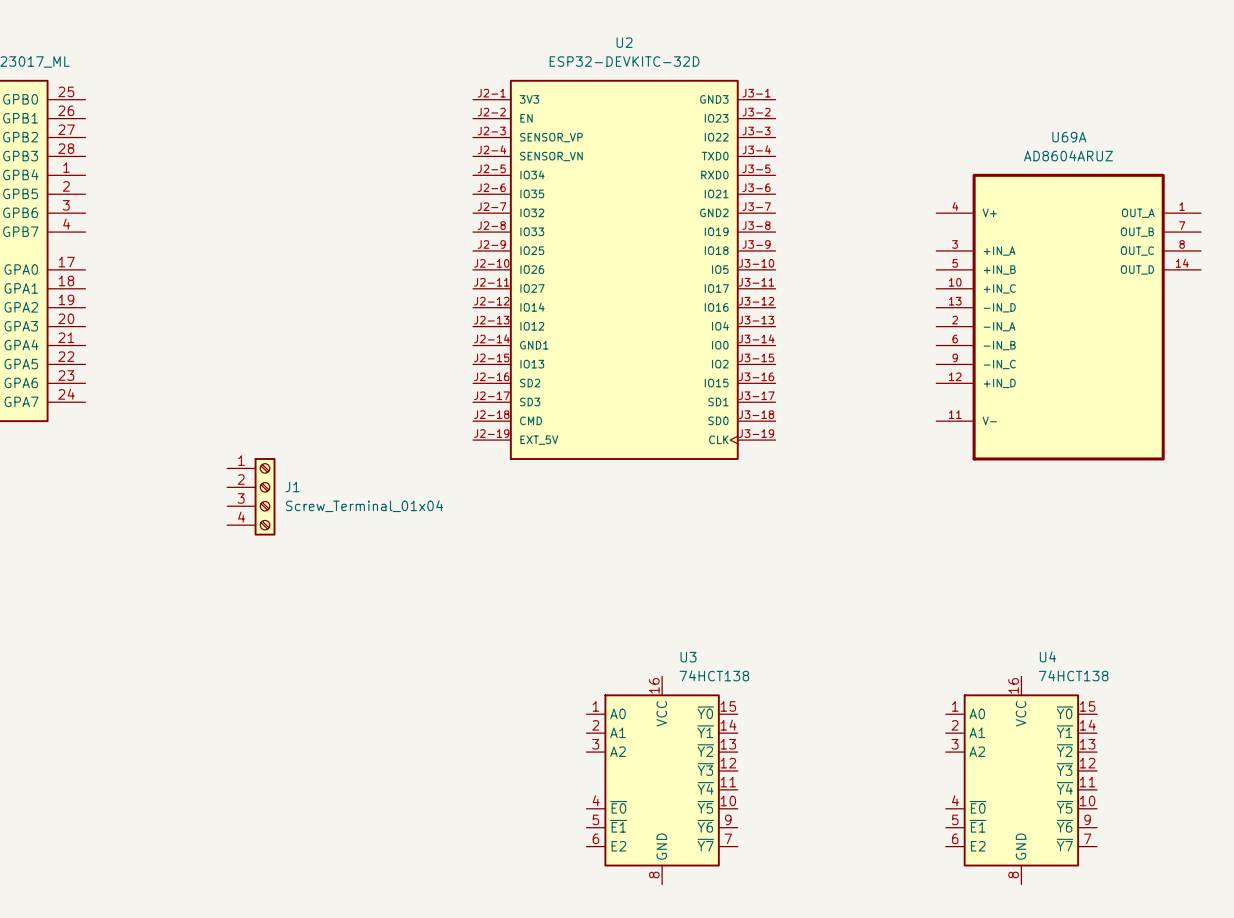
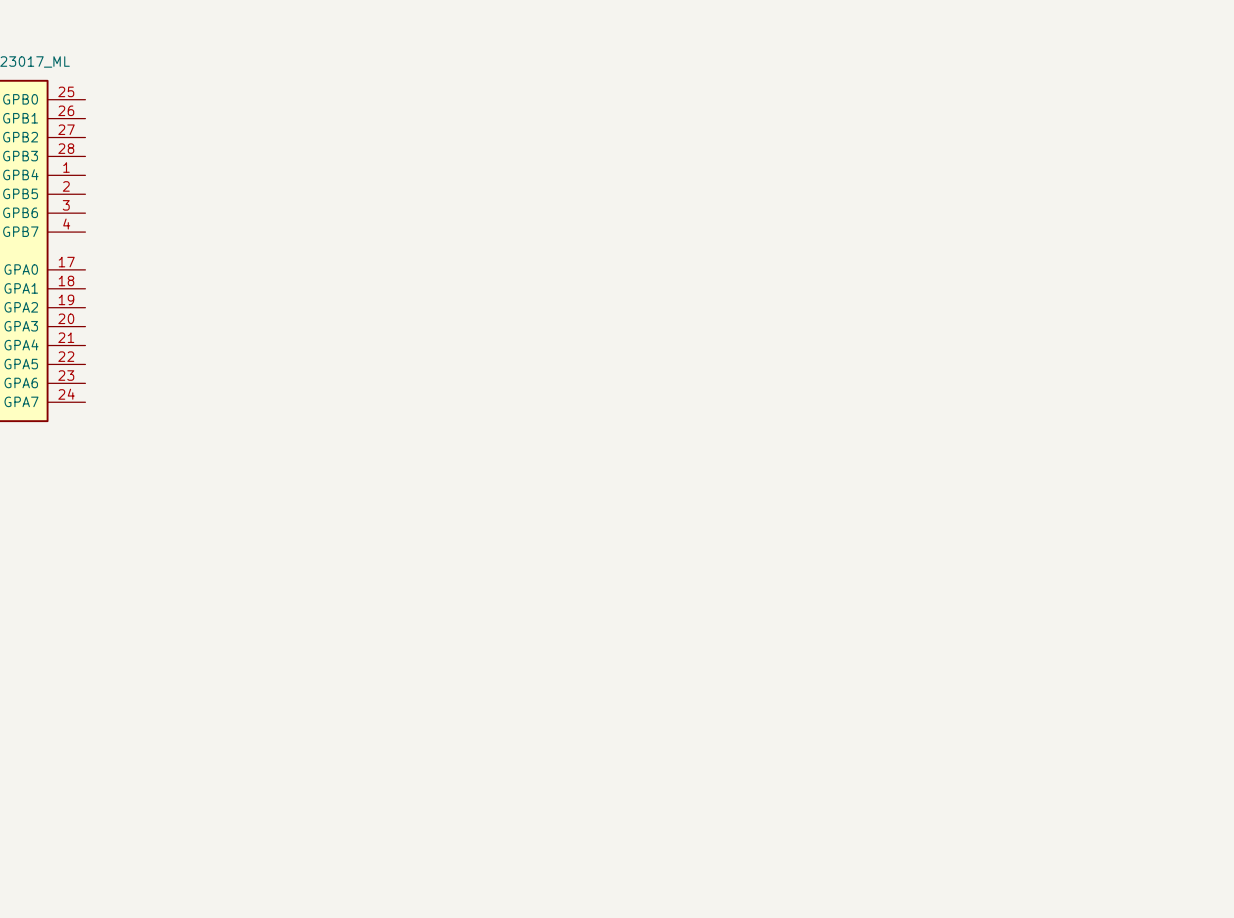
U2: ESP32-DEVKITC-32D (624, 269) -> none
U69A: AD8604ARUZ (1068, 317) -> none
J1: Screw_Terminal_01x04 (251, 496) -> none
U3: 74HCT138 (662, 780) -> none
U4: 74HCT138 (1021, 780) -> none

